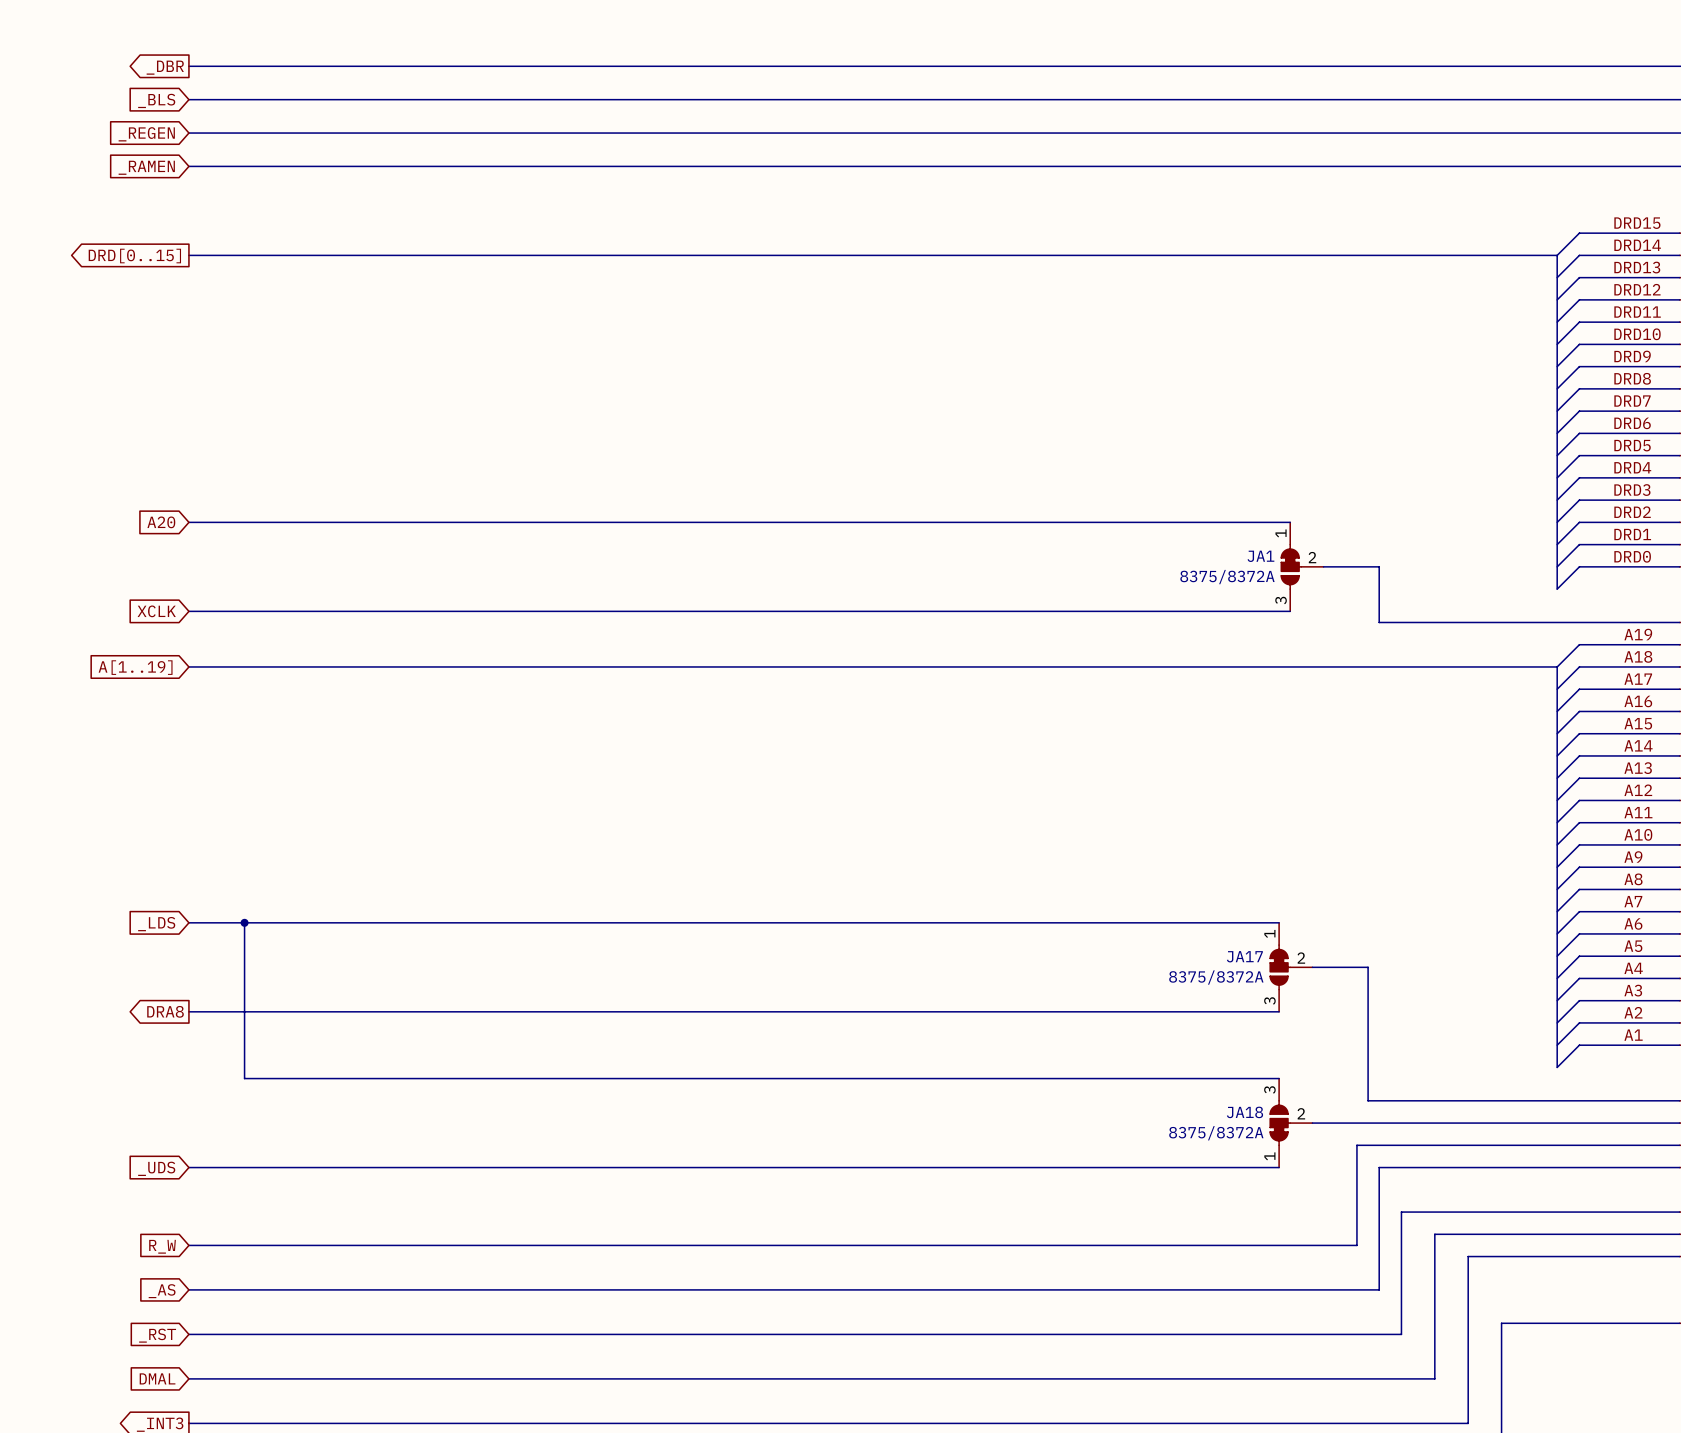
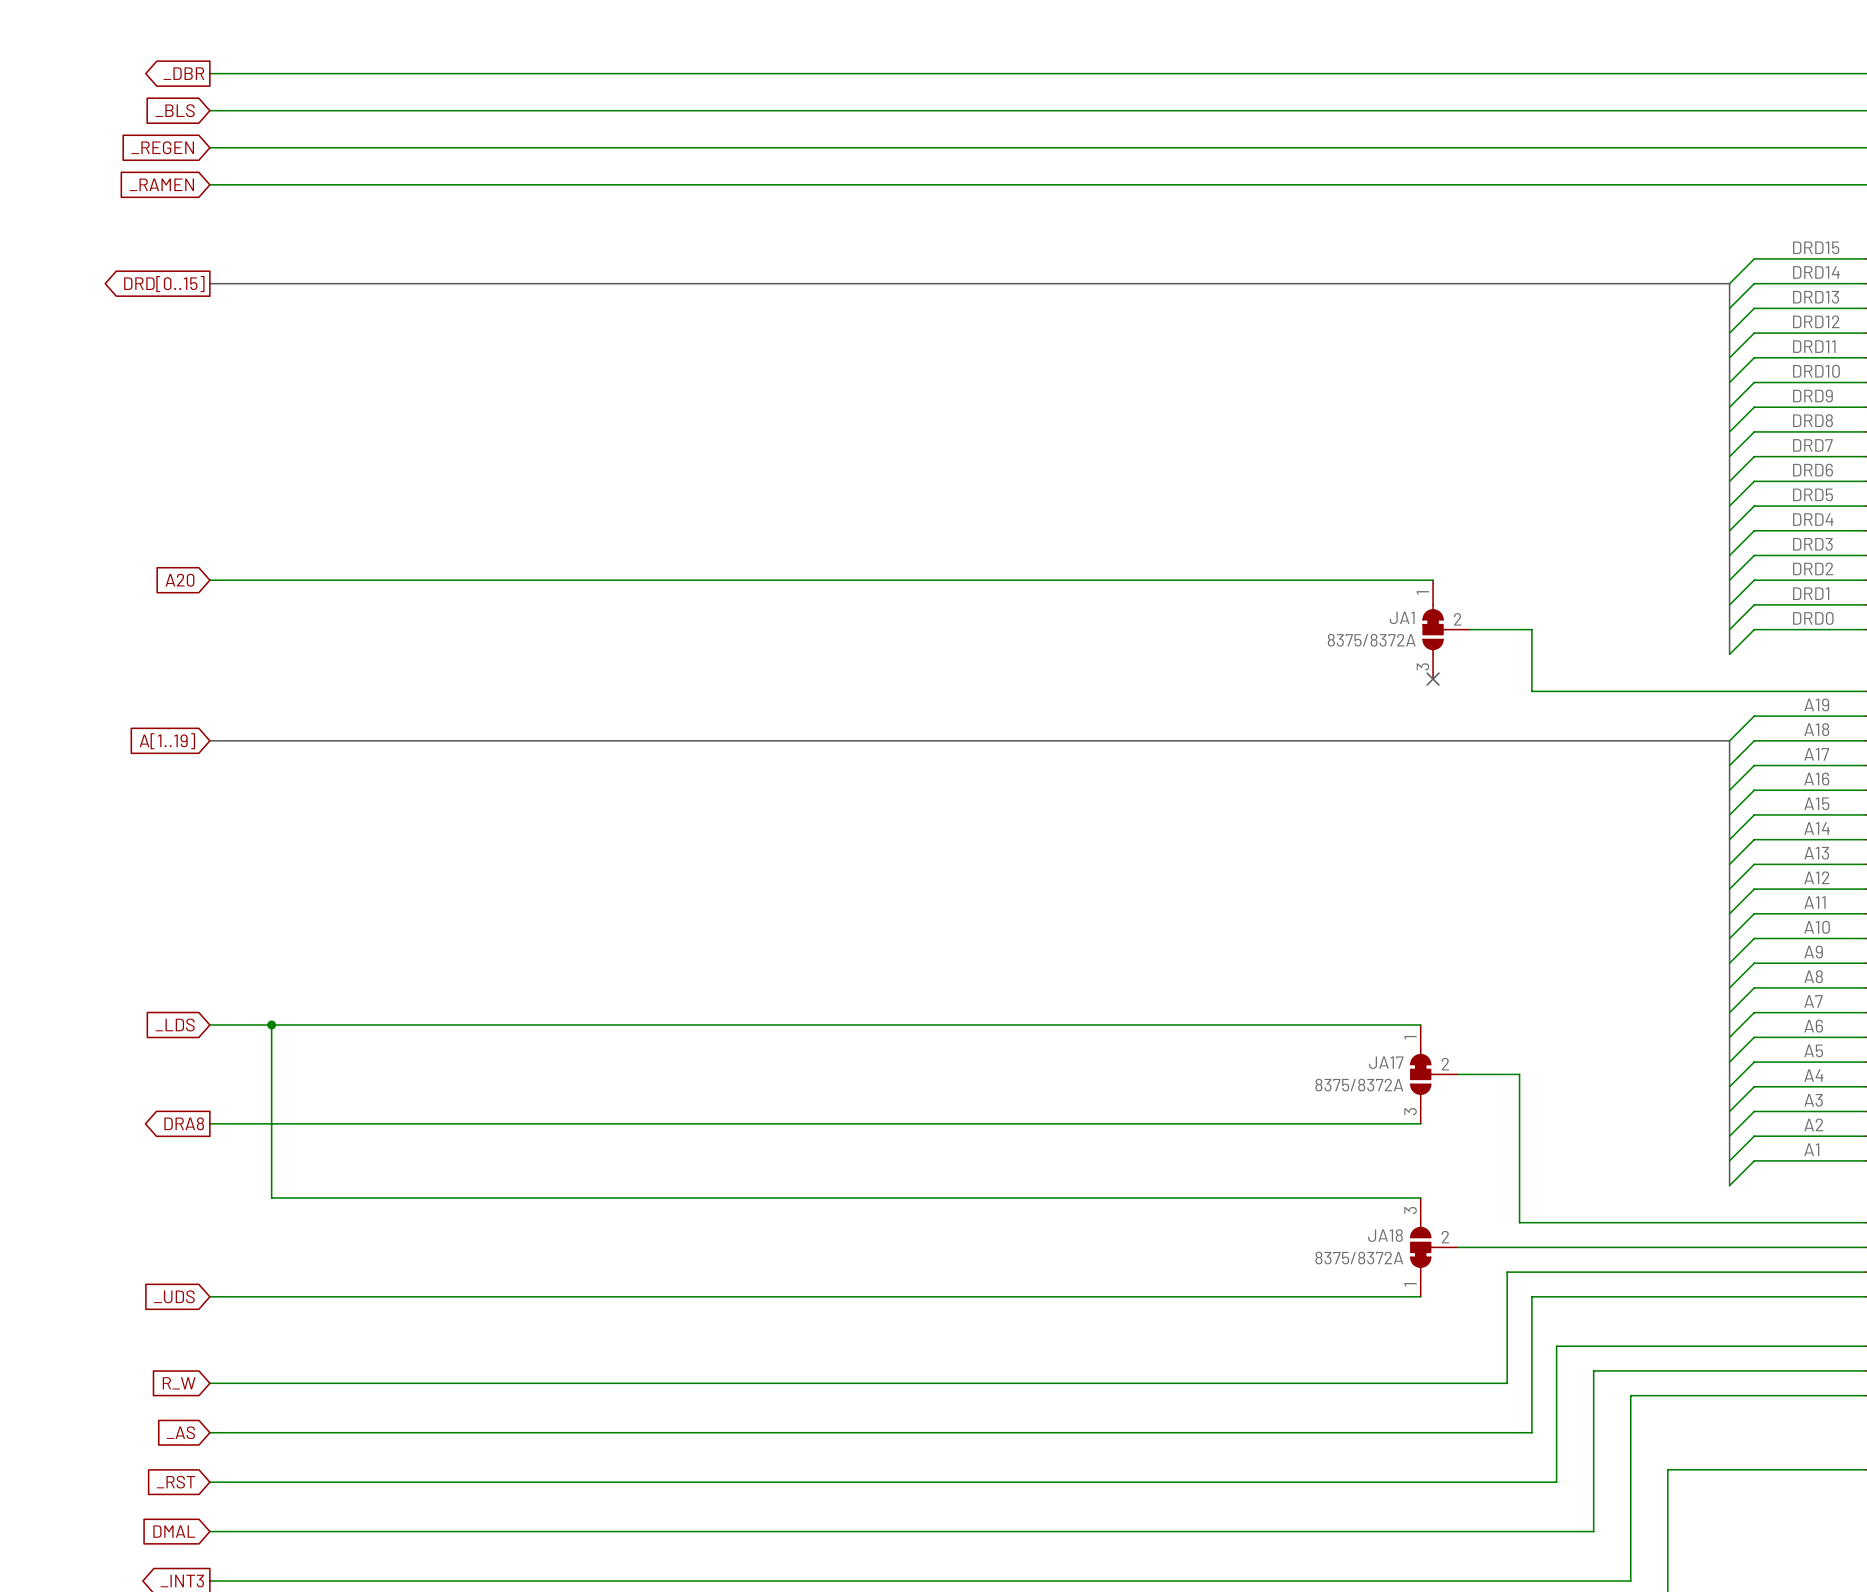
global label: XCLK (156, 611) -> none
wire: (188, 611) (1290, 611) -> none
no-connect mark: none -> (1433, 679)

